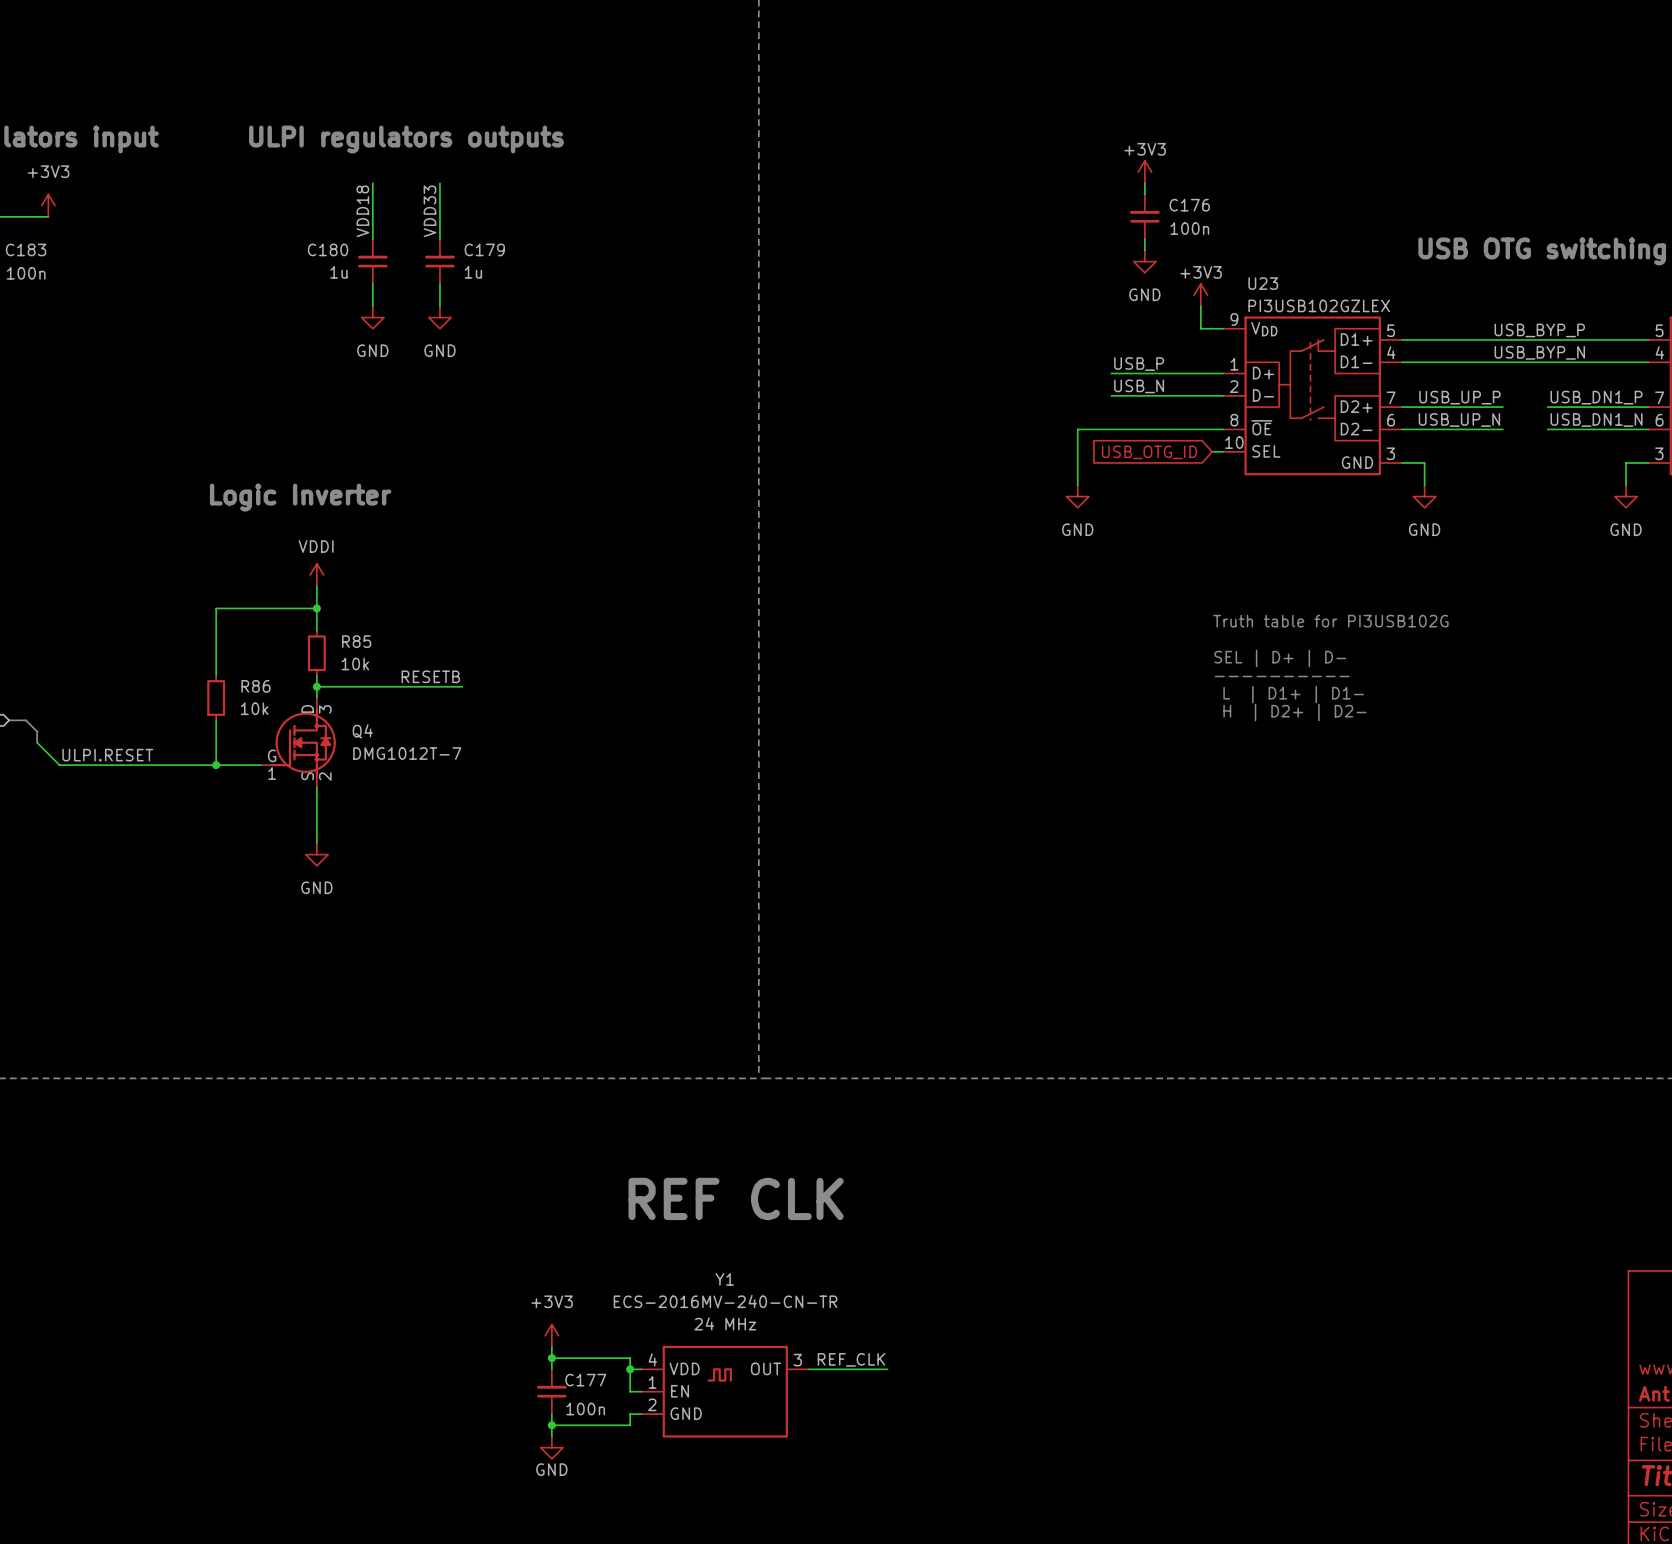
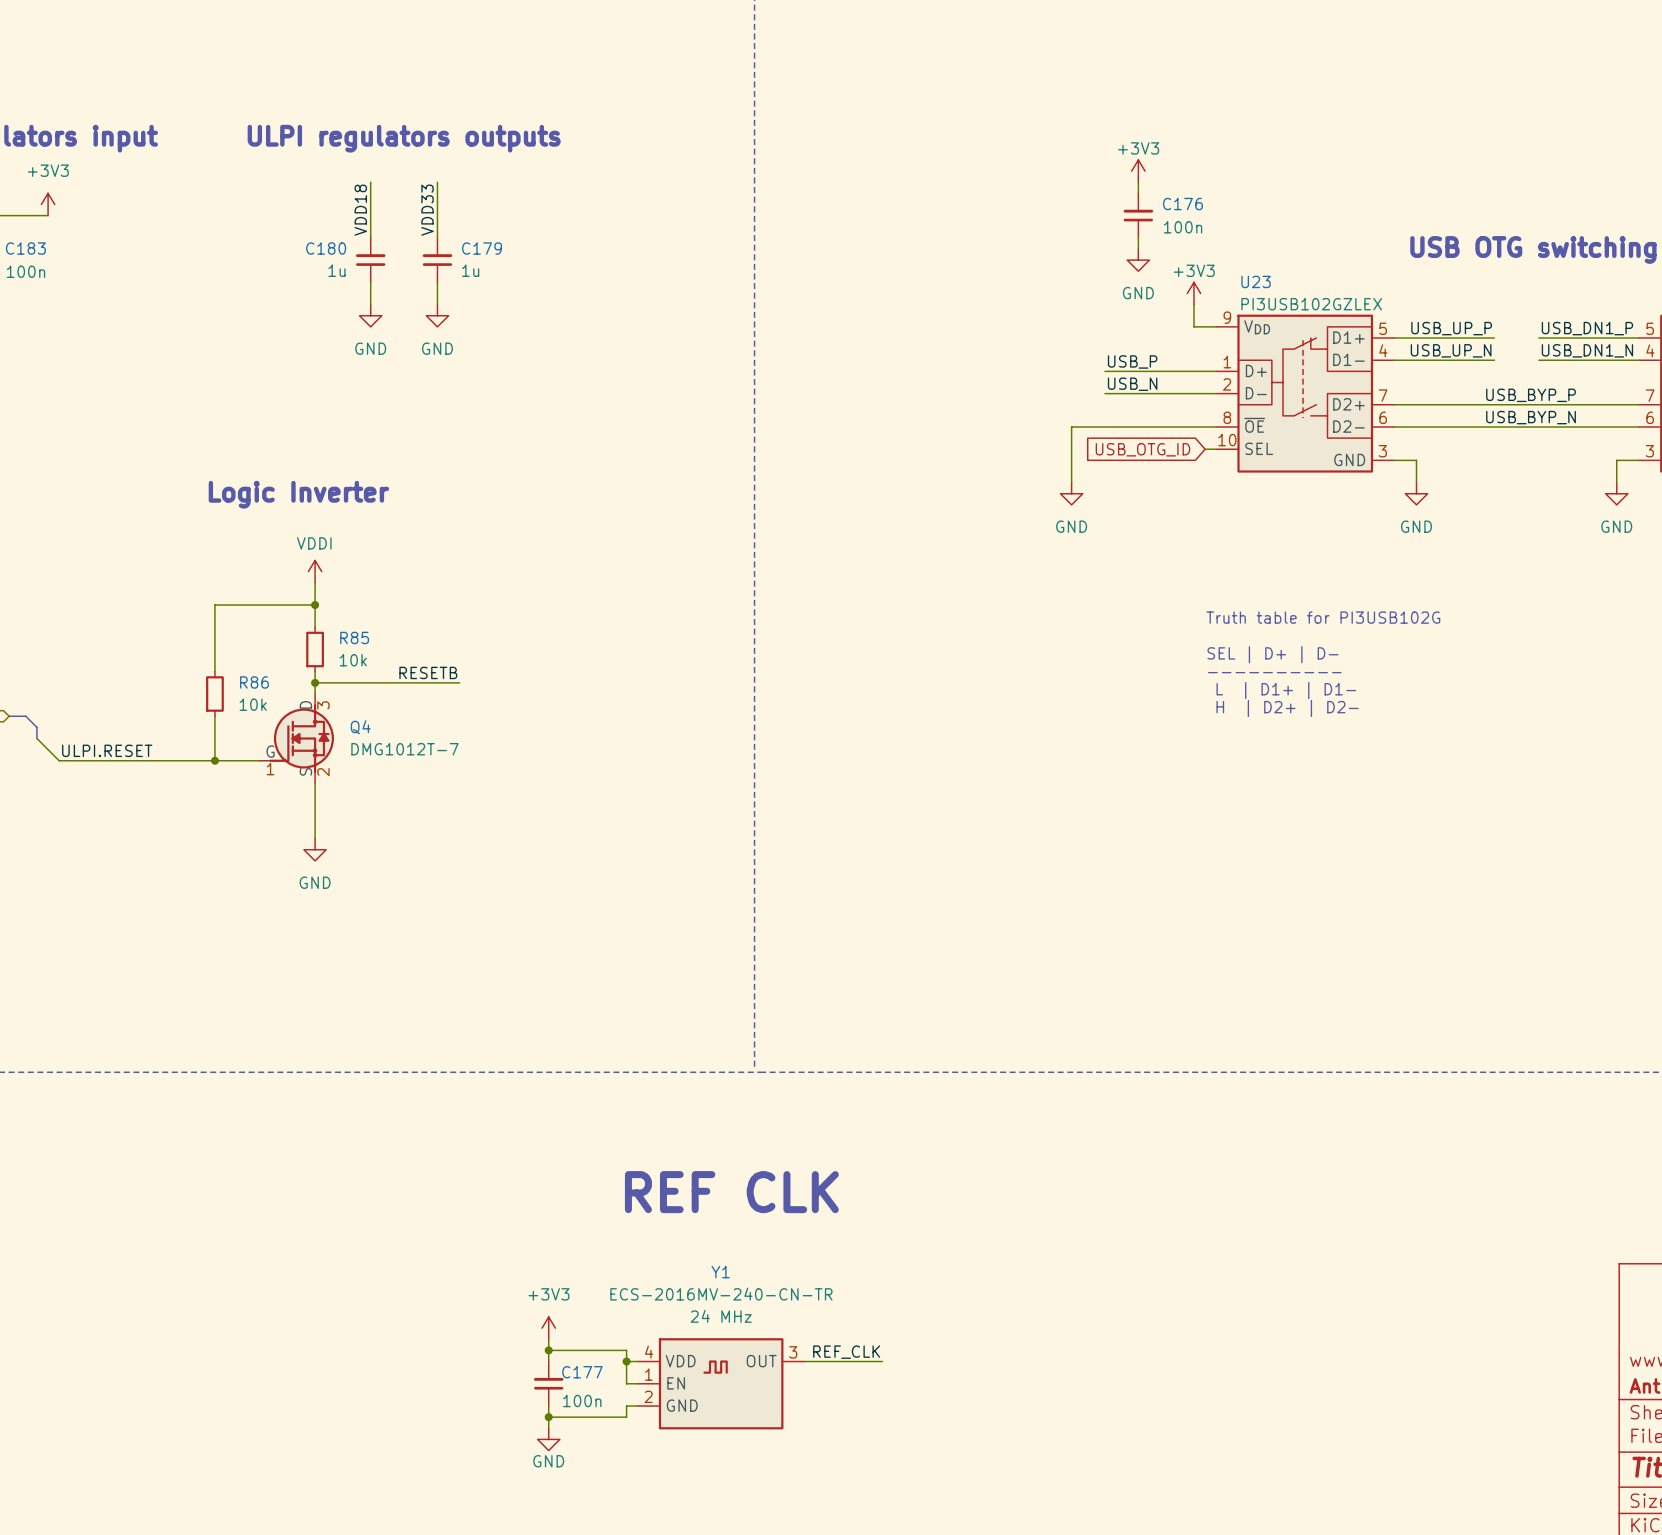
label position: USB_BYP_P (1539, 330) -> USB_BYP_P (1531, 395)
wire: (1502, 339) (1547, 339) -> (1494, 427) (1538, 427)
label position: USB_BYP_N (1539, 352) -> USB_BYP_N (1531, 417)
wire: (1502, 362) (1547, 362) -> (1494, 404) (1538, 404)
label position: USB_UP_P (1459, 397) -> USB_UP_P (1451, 328)
label position: USB_DN1_P (1596, 397) -> USB_DN1_P (1587, 328)
label position: USB_UP_N (1459, 419) -> USB_UP_N (1451, 350)
label position: USB_DN1_N (1596, 419) -> USB_DN1_N (1587, 350)

